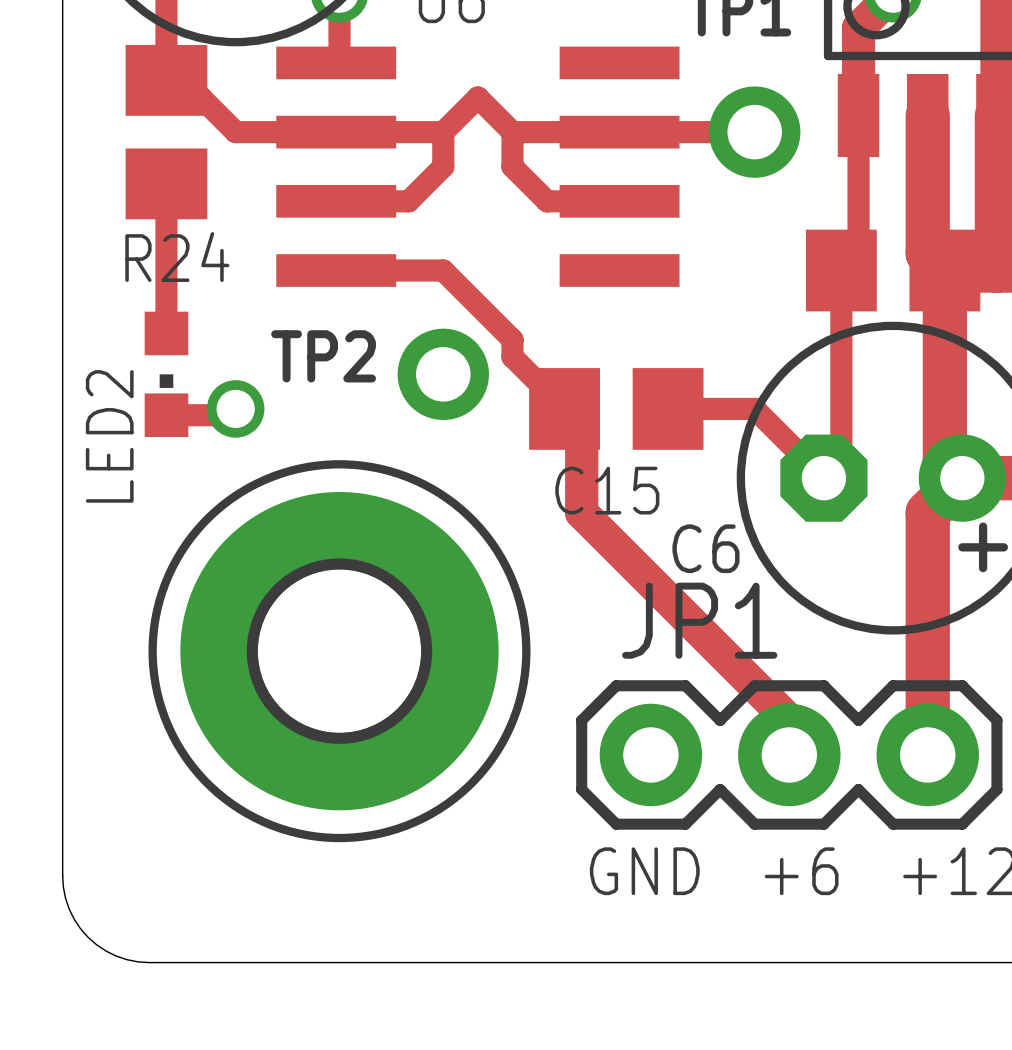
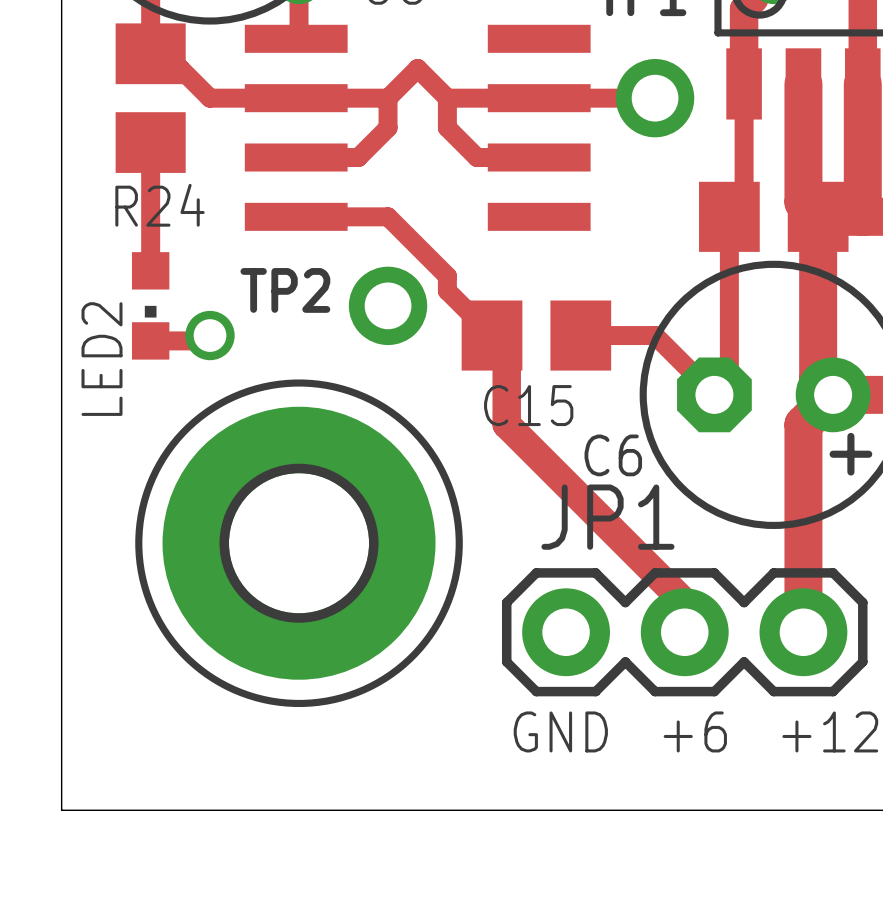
board edge: (62, 876) (69, 909) (88, 937) (116, 956) (149, 962) -> (61, 736) (61, 810) (135, 810)

